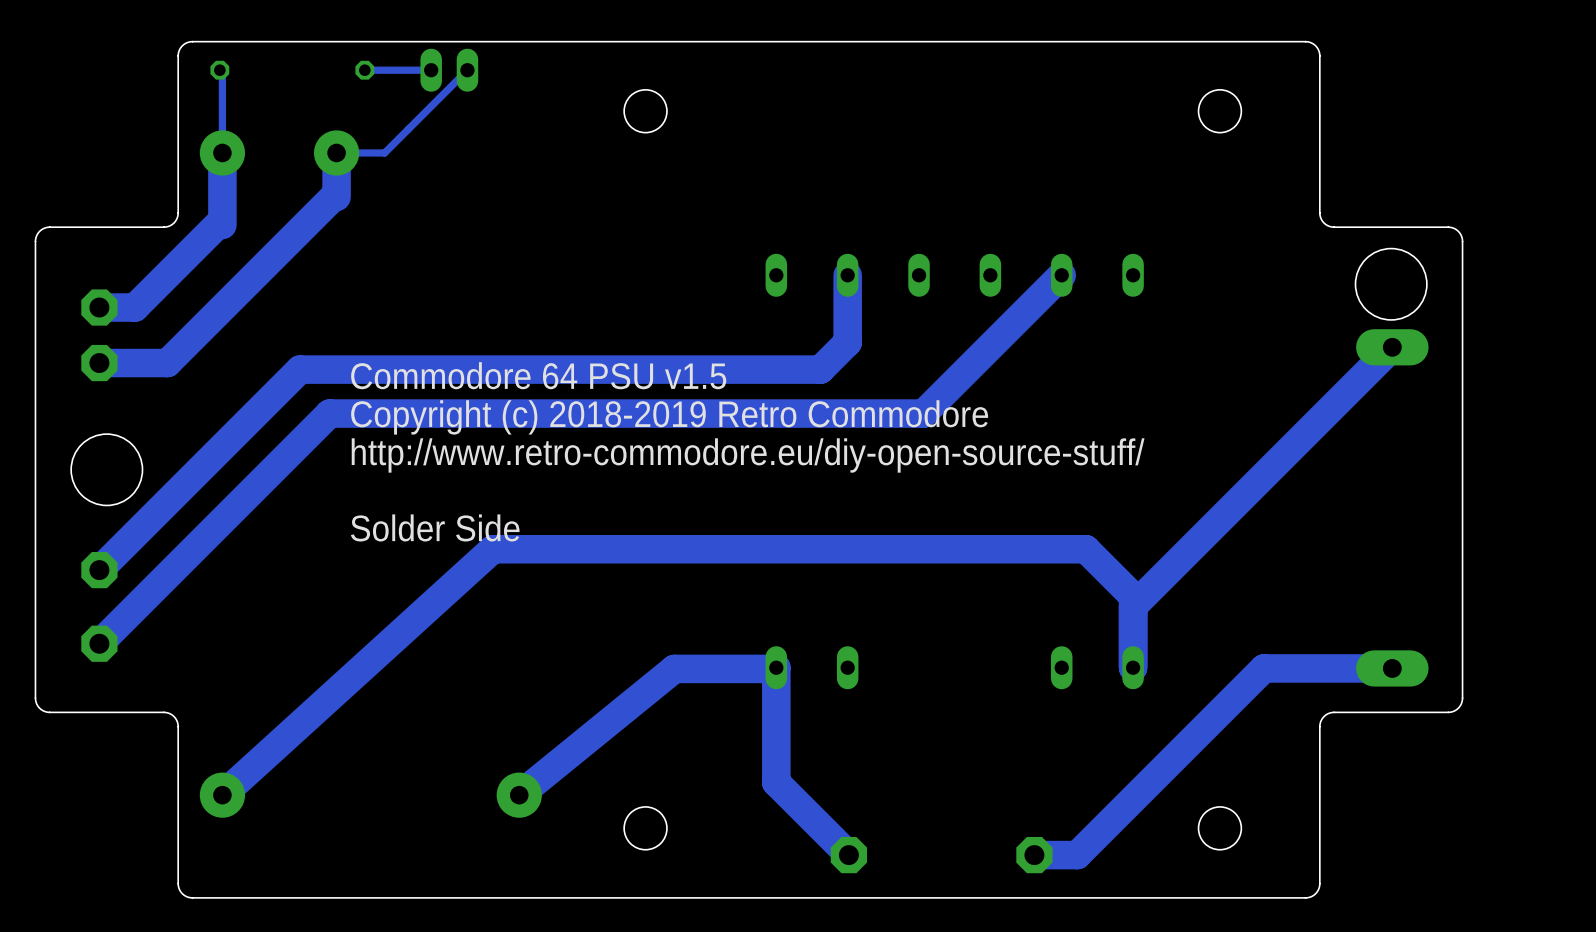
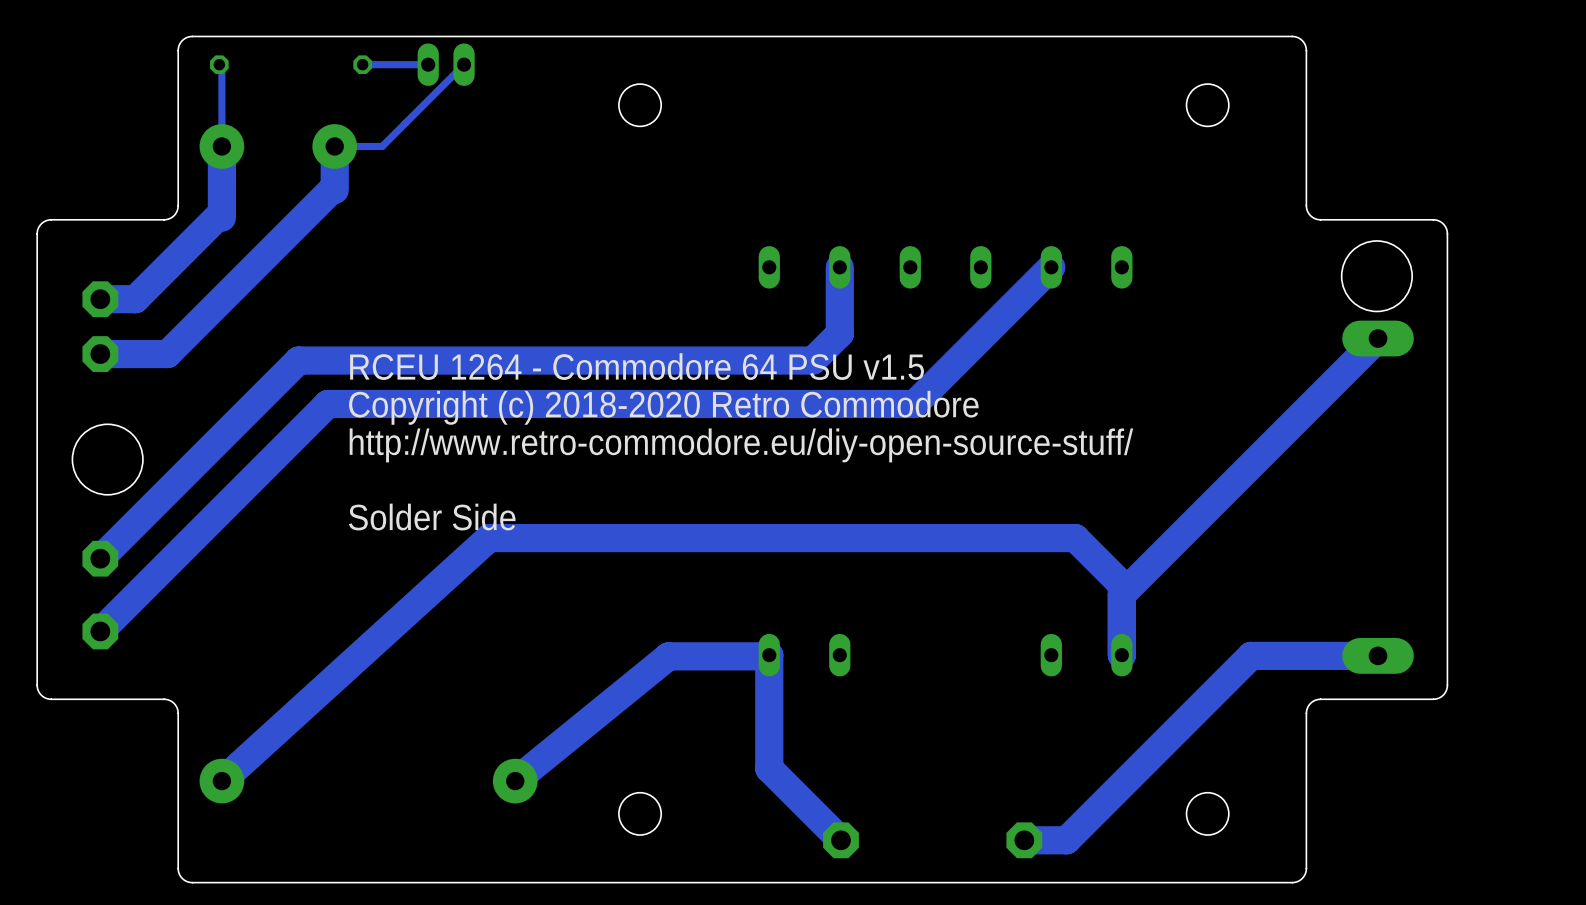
text: Commodore 64 PSU v1.5 (538, 375) -> RCEU 1264 - Commodore 64 PSU v1.5 (637, 366)
text: Copyright (c) 2018-2019 Retro Commodore (669, 417) -> Copyright (c) 2018-2020 Retro Commodore (663, 407)

